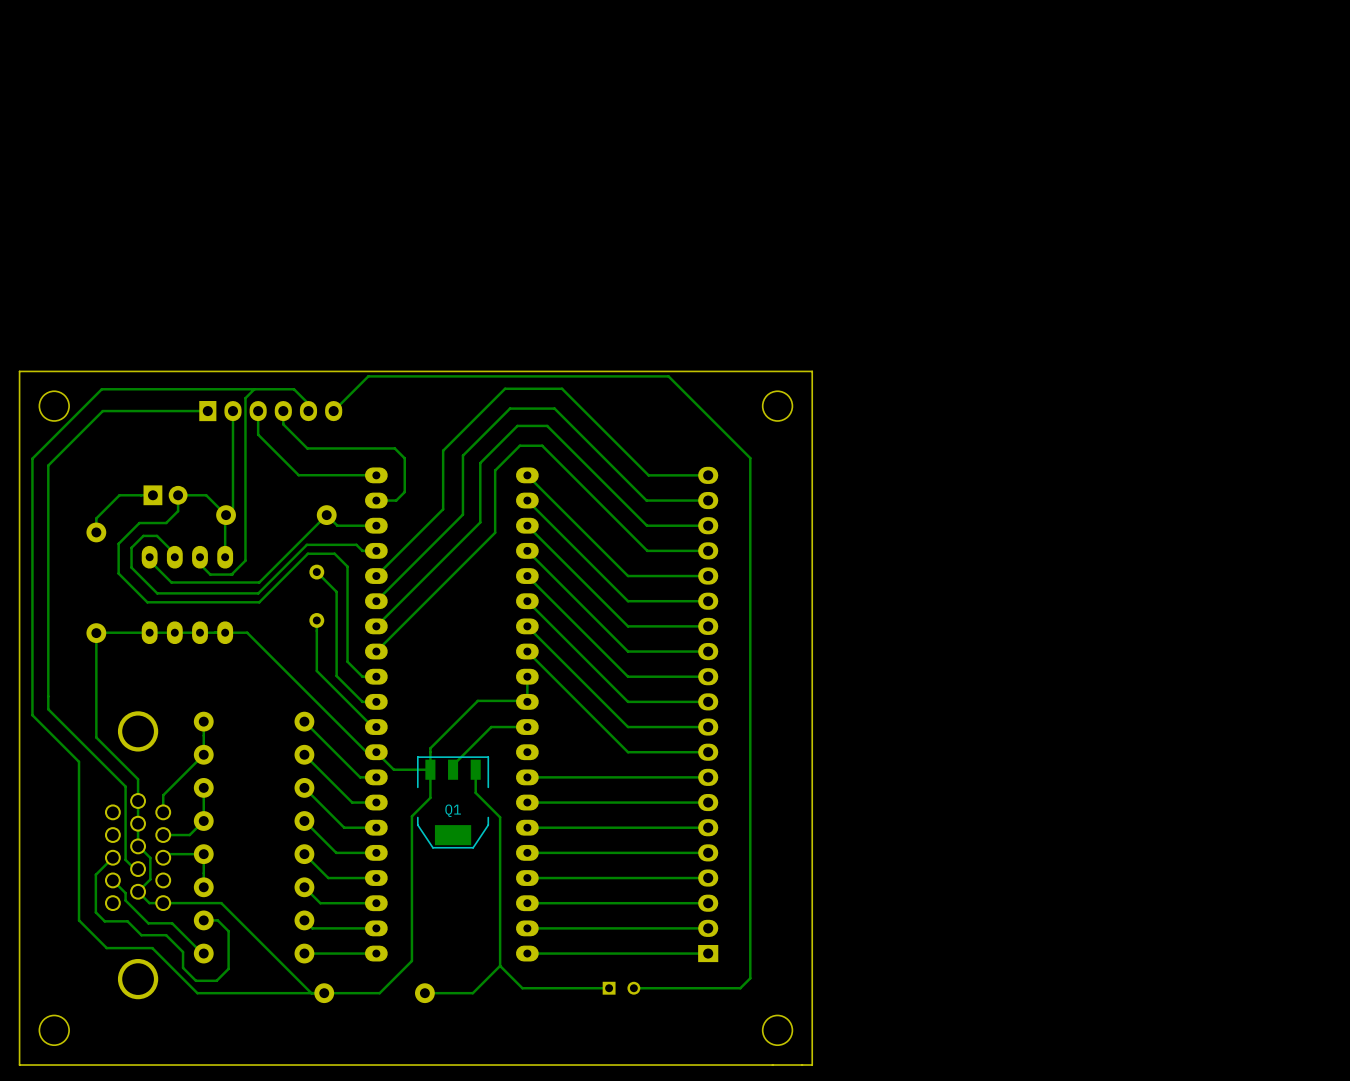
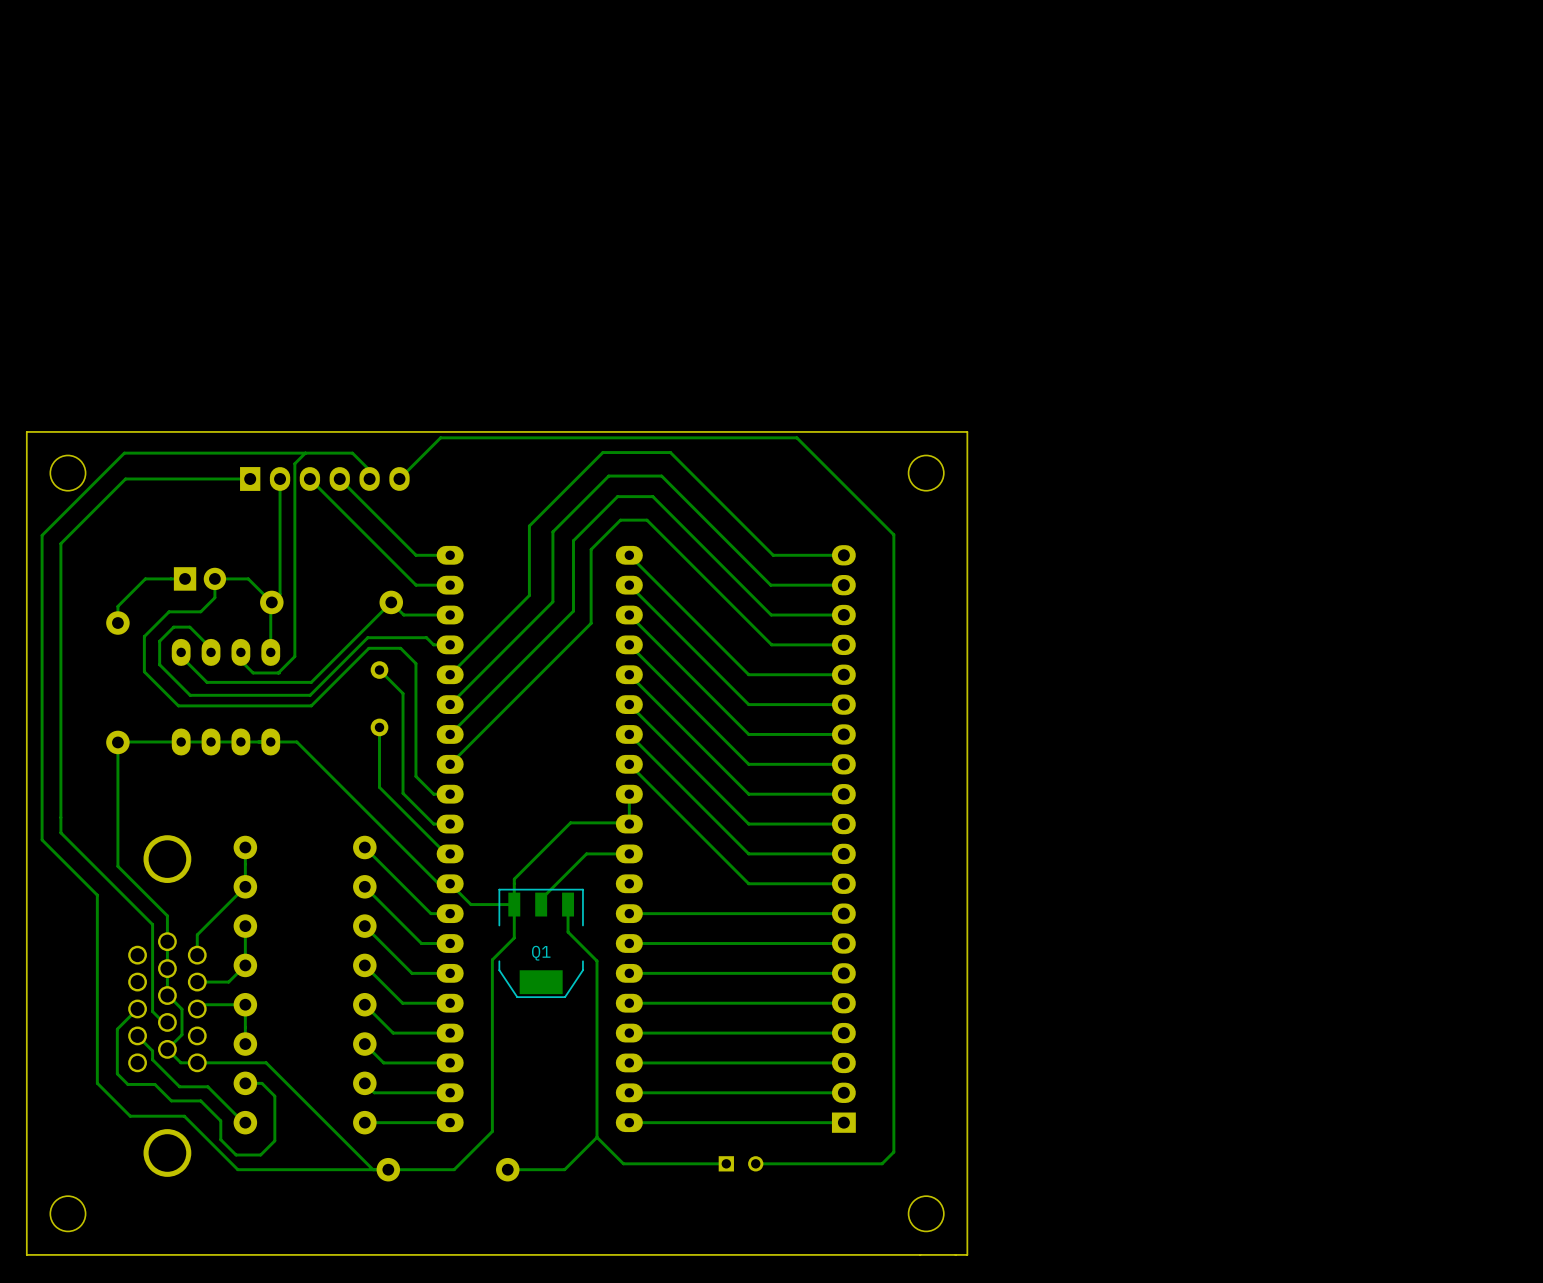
bottom track: (258, 411) (258, 434) (298, 475) (376, 475) -> (339, 478) (416, 555) (450, 555)
bottom track: none -> (309, 478) (416, 585) (450, 585)
bottom track: (283, 411) (283, 424) (307, 448) (394, 448) (404, 458) (404, 492) (396, 500) (383, 500) -> none

